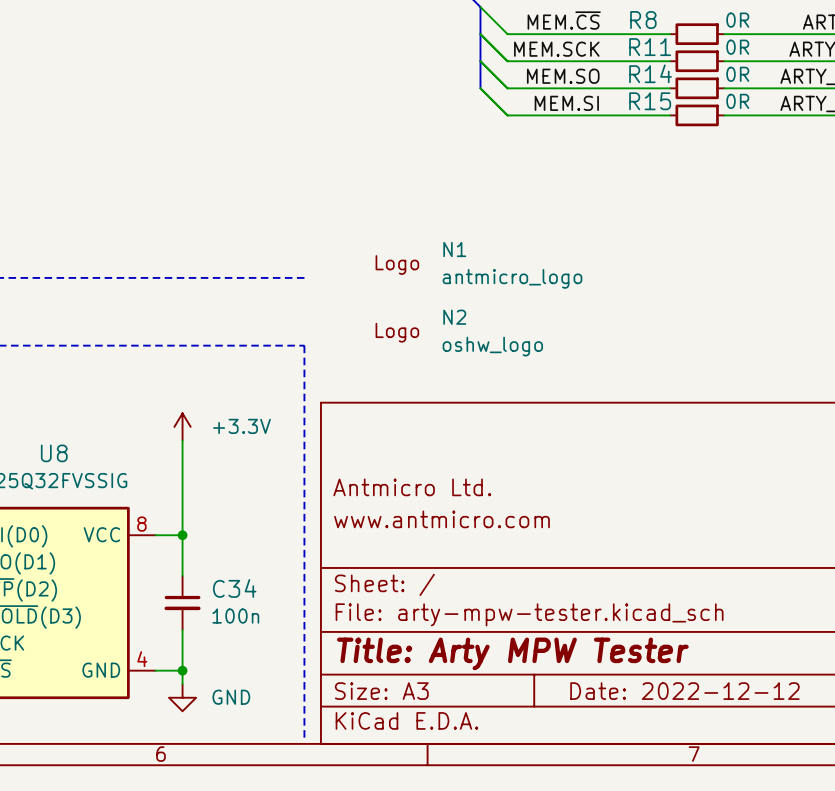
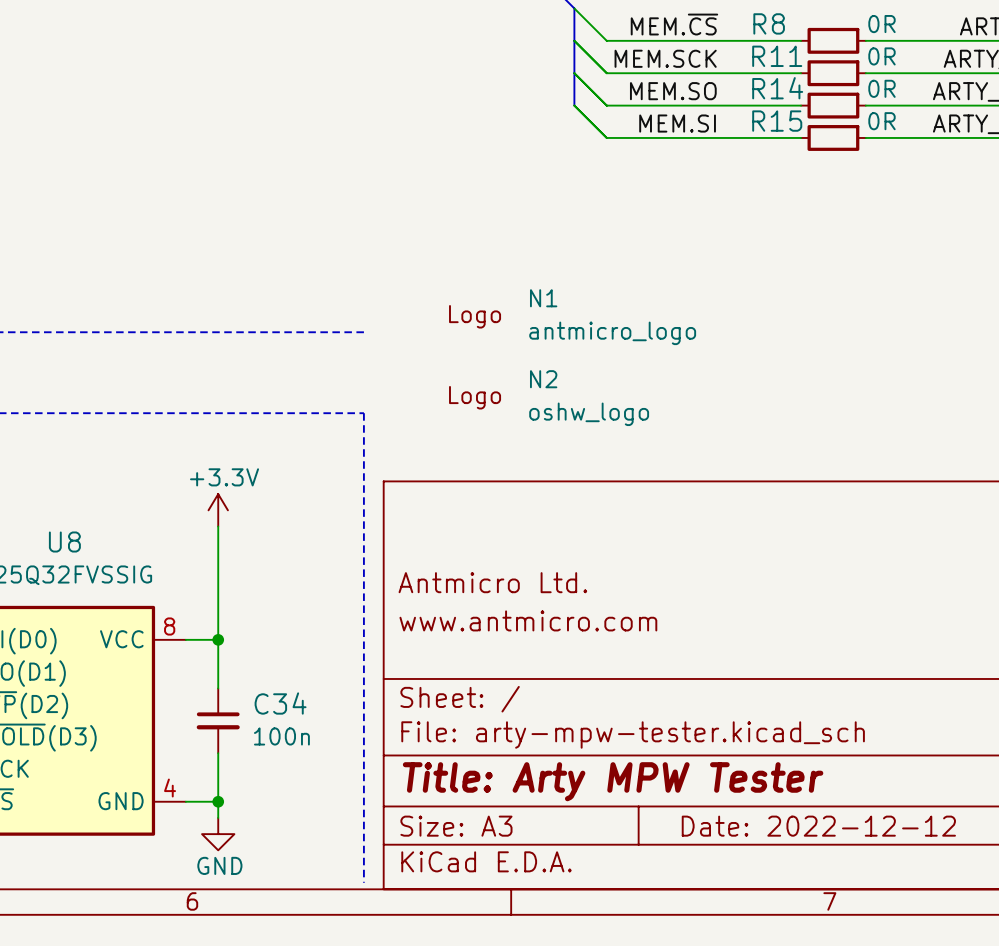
power symbol text position: +3.3V (241, 426) -> +3.3V (224, 477)
power symbol text position: GND (231, 697) -> GND (219, 865)

